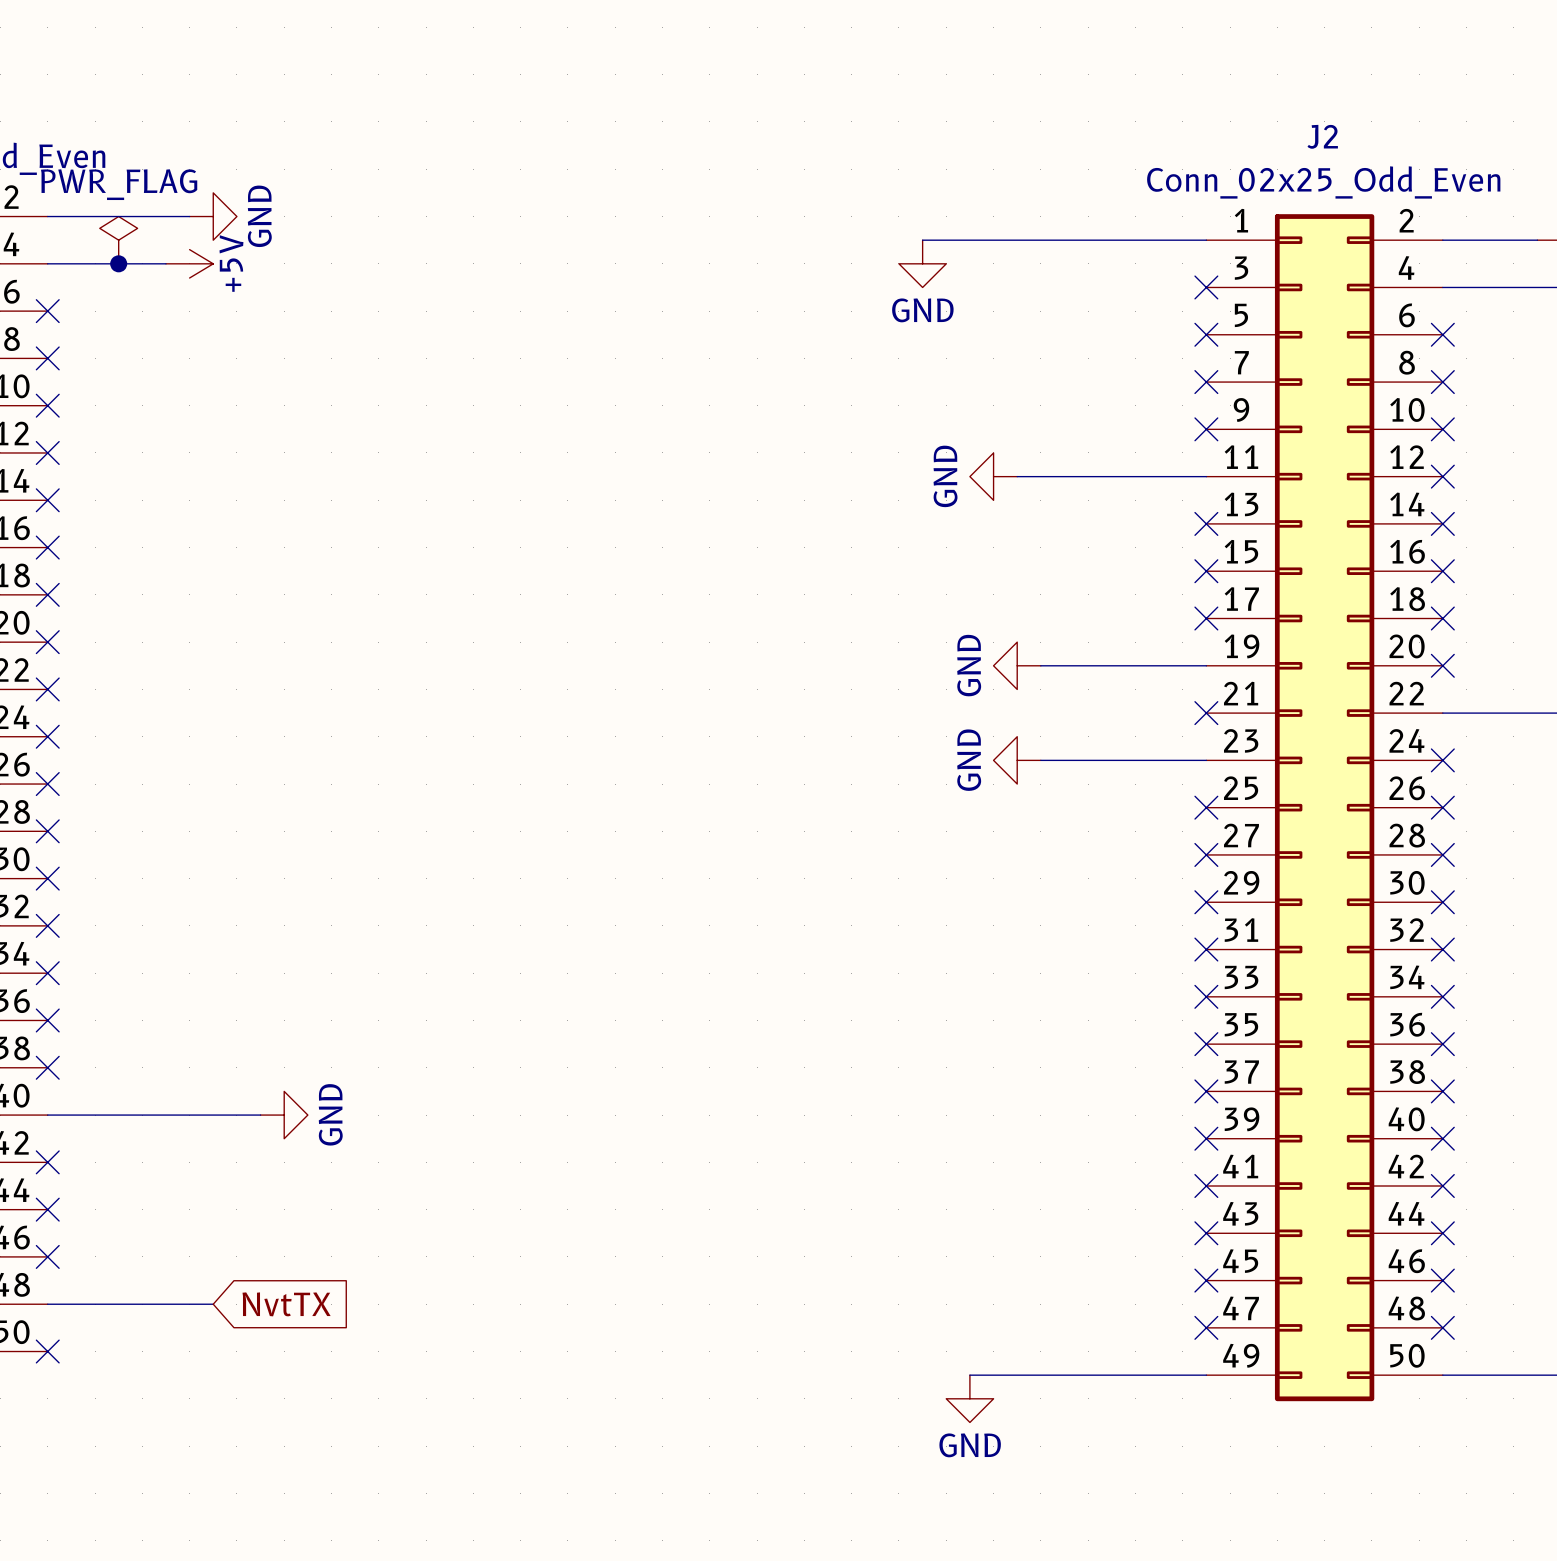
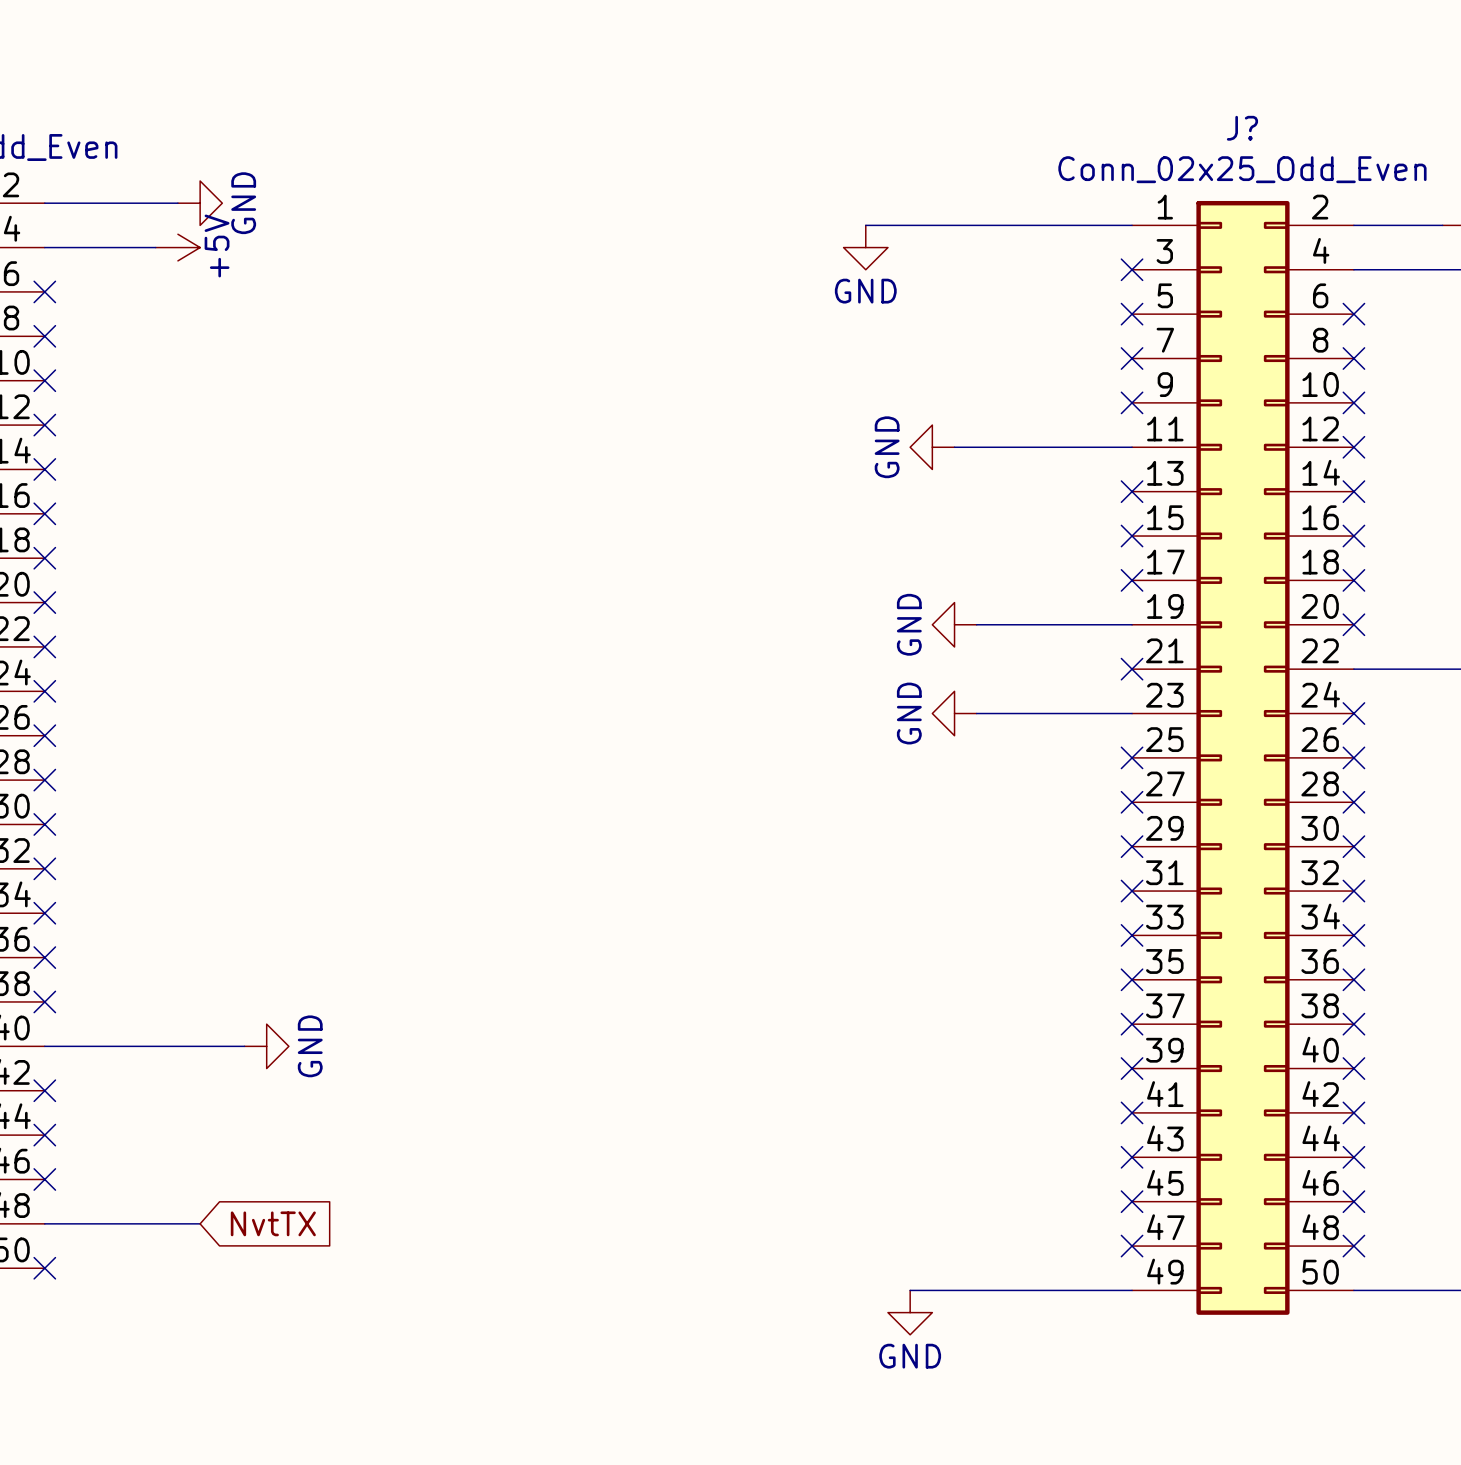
J2 name: J2 (1322, 136) -> J? (1242, 128)
power symbol: PWR_FLAG (118, 240) -> none
junction: (118, 263) -> none

